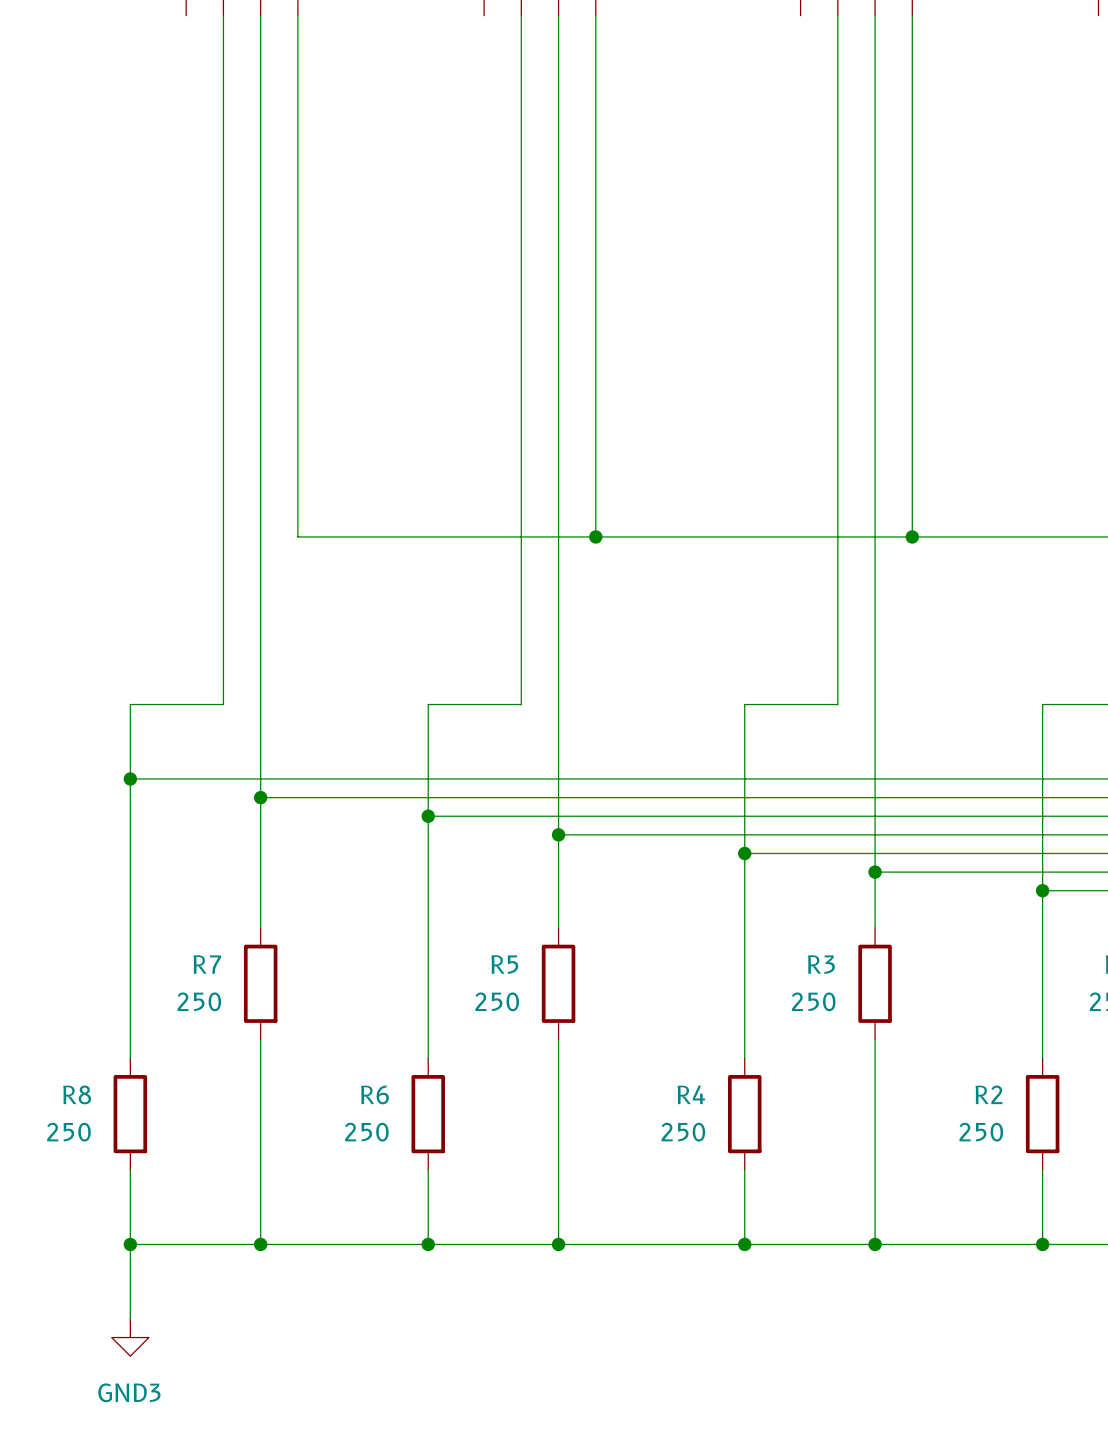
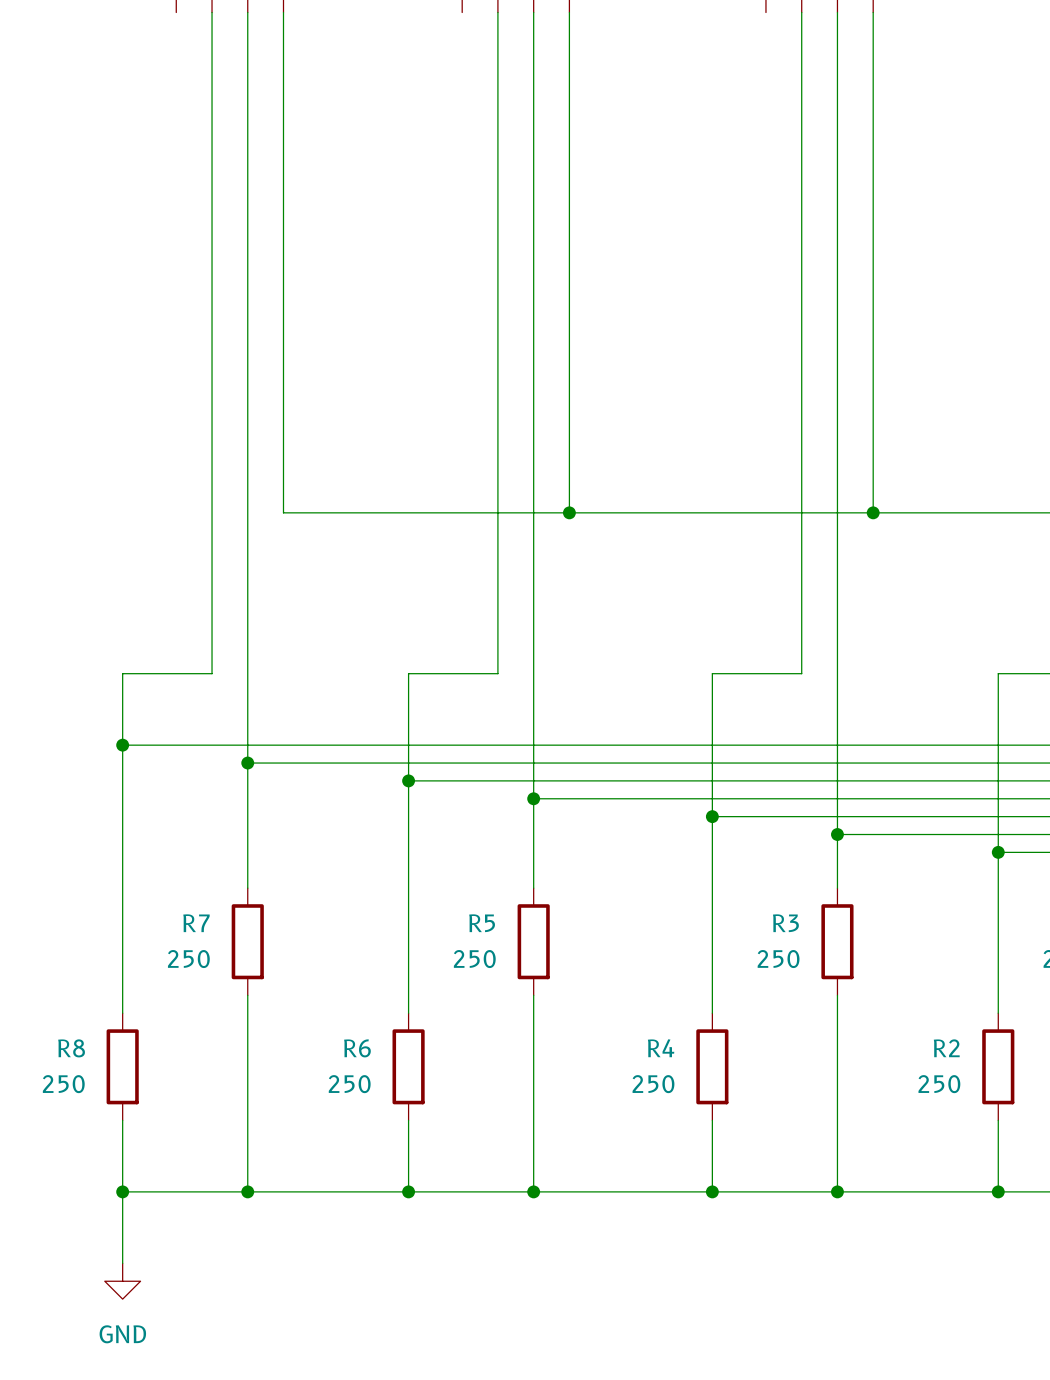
power symbol: GND3 (130, 1337) -> GND (122, 1281)

